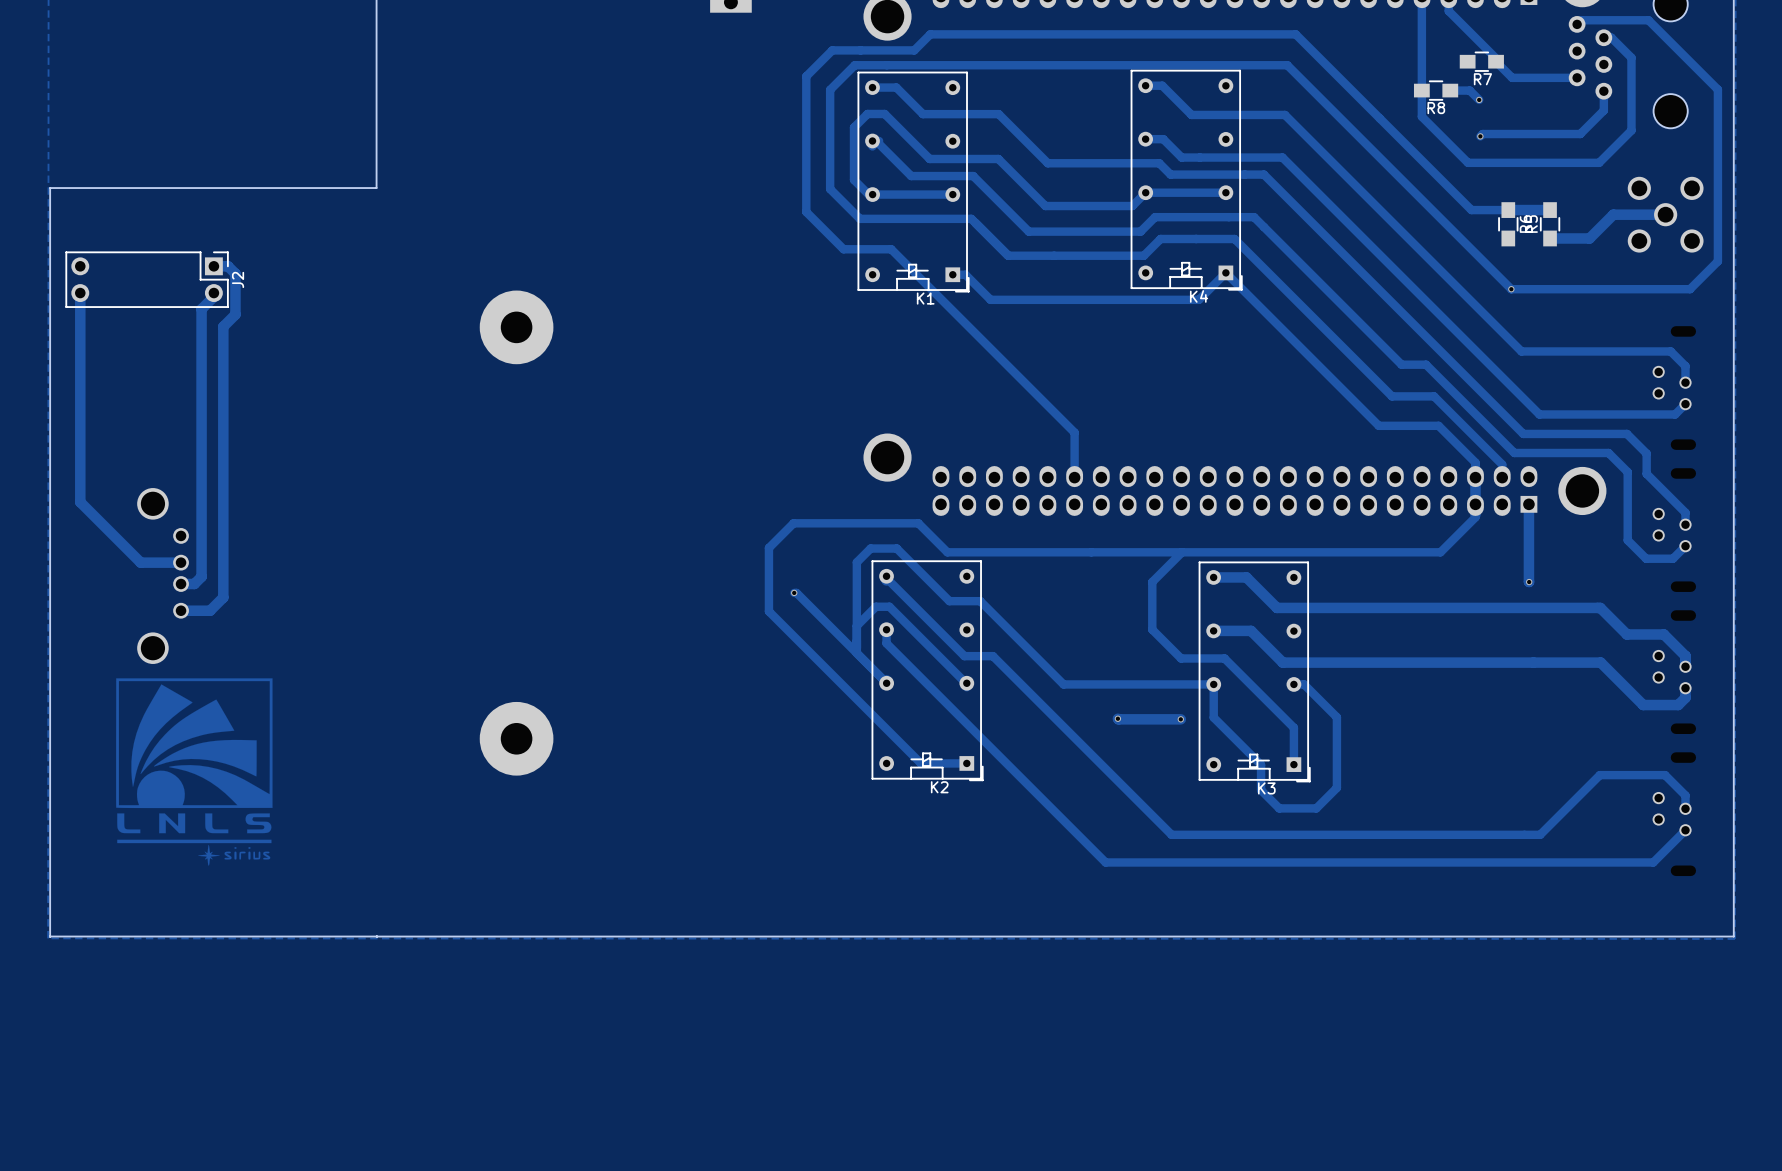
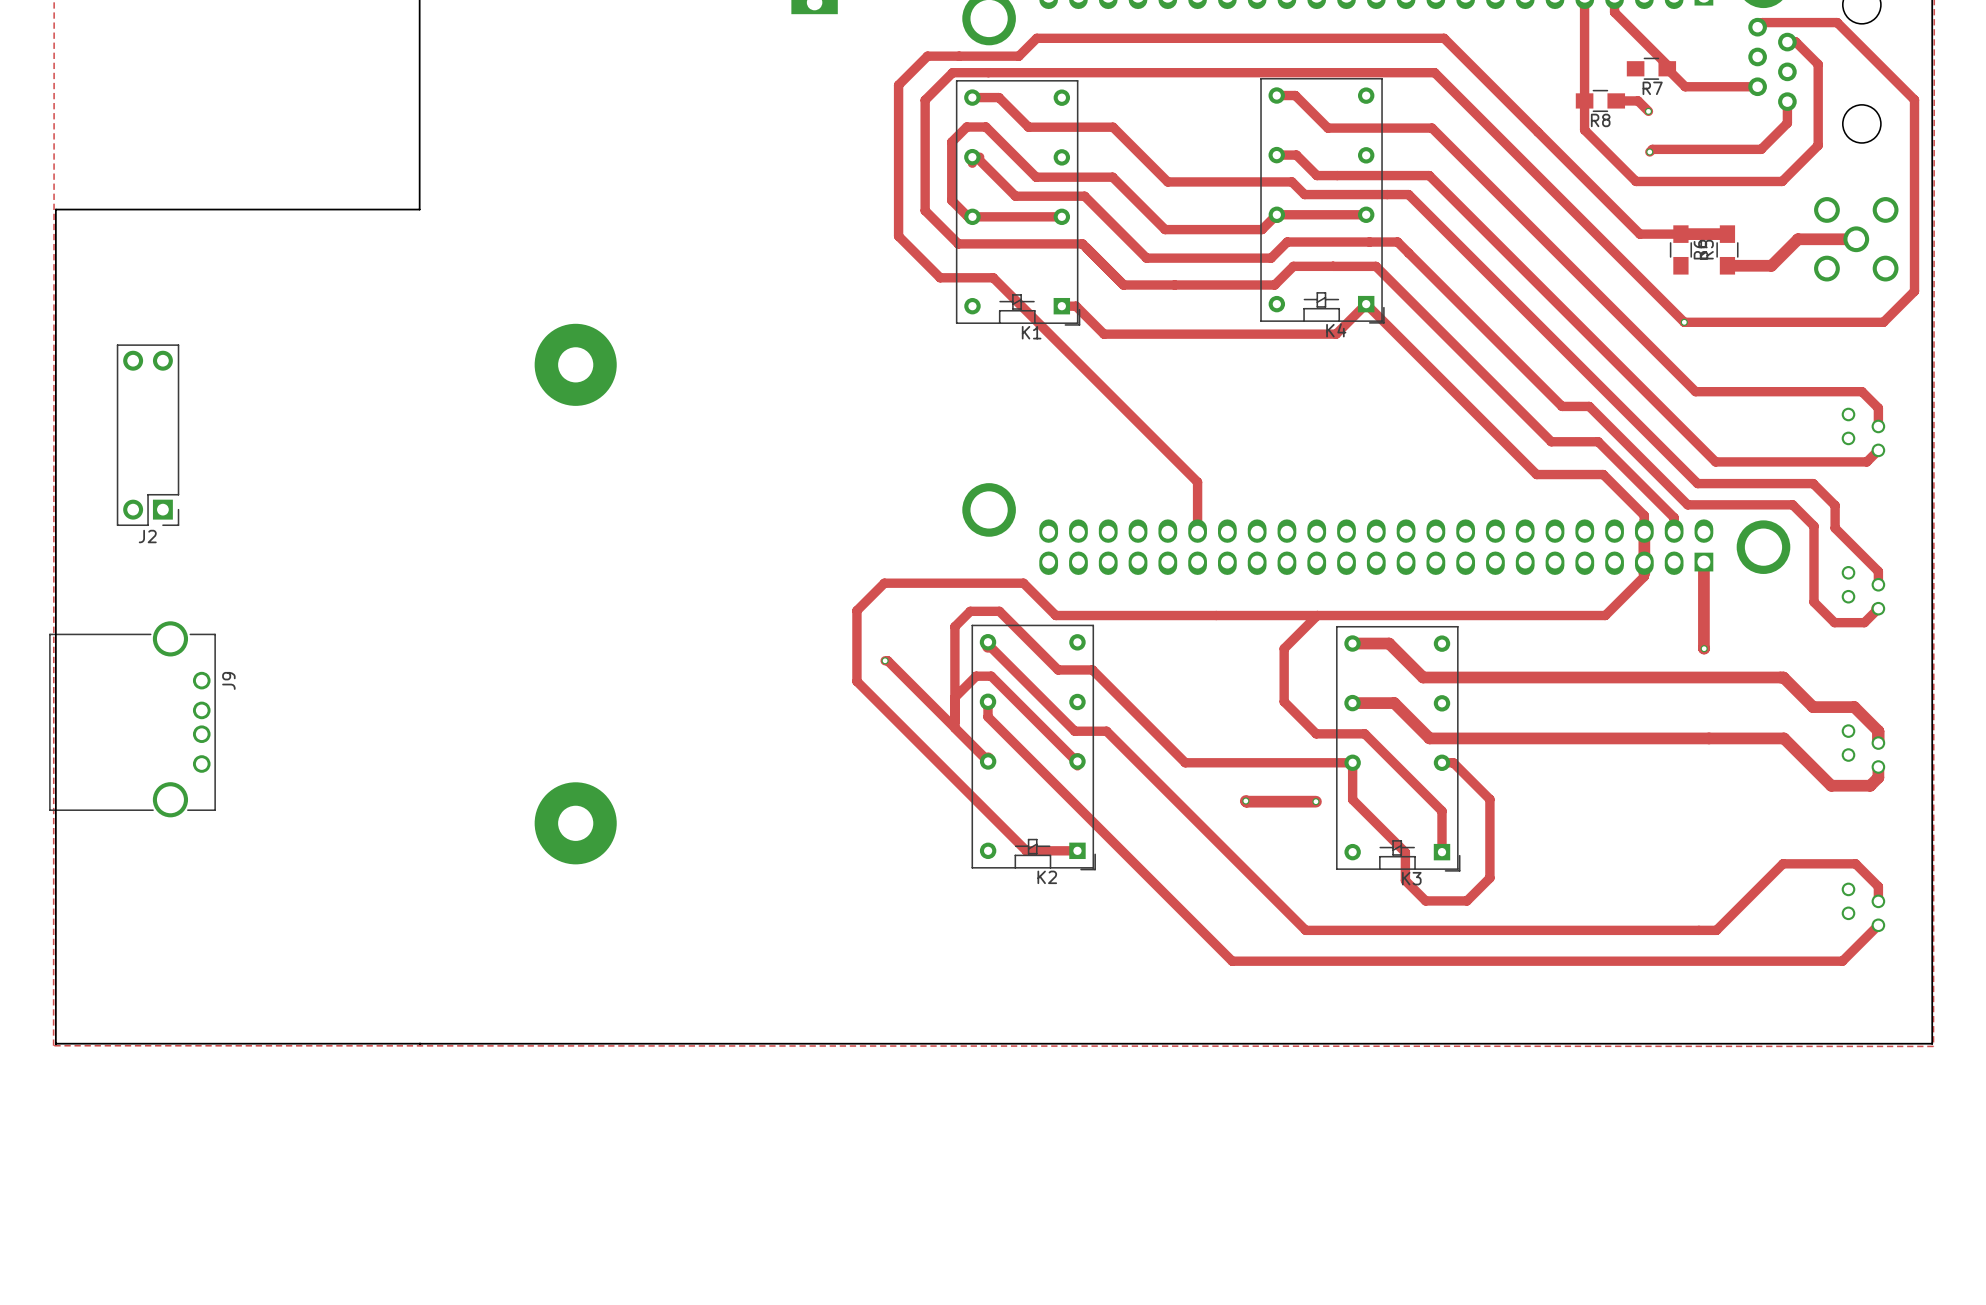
track: (213, 266) (228, 266) (235, 273) (235, 314) (223, 326) (223, 597) (210, 610) (181, 610) -> none
J2 rotation: 0° (147, 279) -> 90° clockwise (148, 435)
J2 position: (147, 279) -> (148, 435)
track: (80, 293) (80, 502) (140, 562) (181, 562) -> none
track: (213, 293) (213, 296) (201, 309) (201, 576) (194, 584) (181, 584) (178, 586) -> none
J9 side: bottom (163, 576) -> top (132, 719)
drawing: [116, 678, 273, 866] -> none

